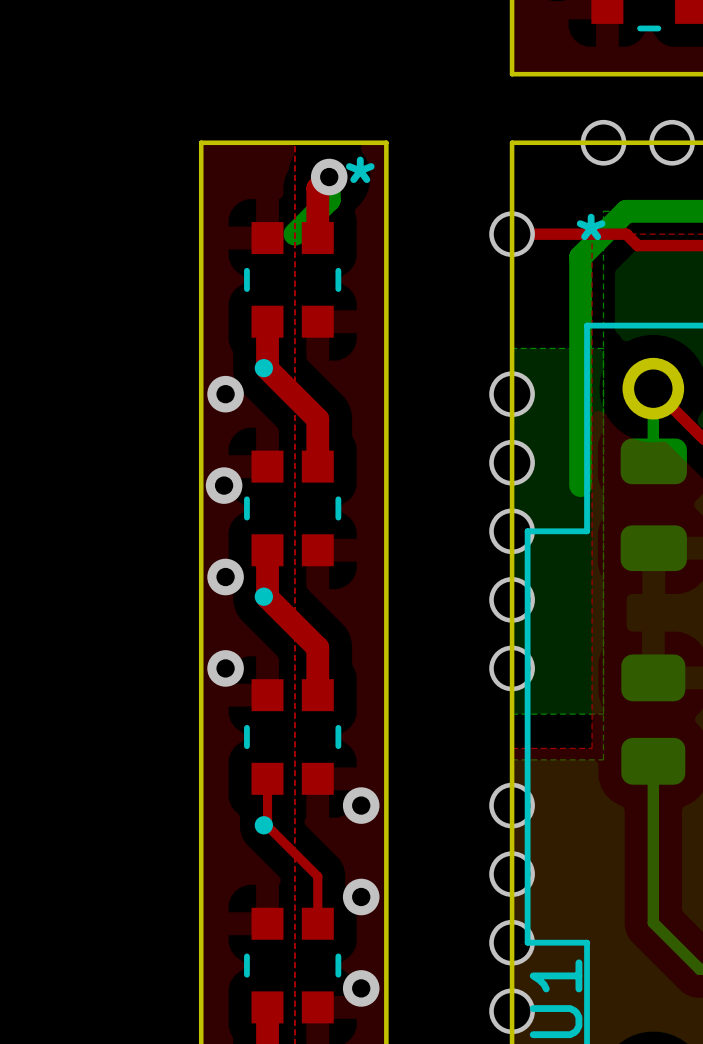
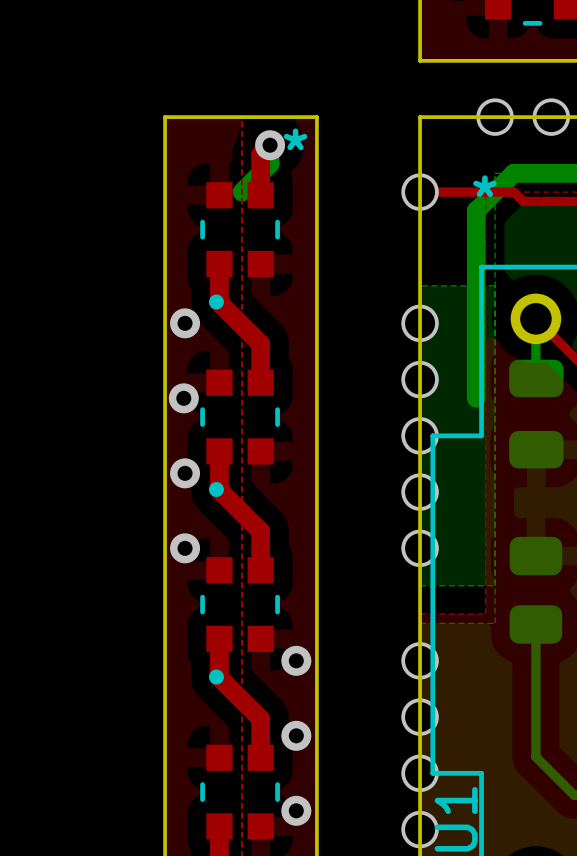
top track width: thin (267, 778) (267, 826) (317, 876) (317, 923) -> thick (219, 638) (219, 677) (260, 718) (260, 757)

